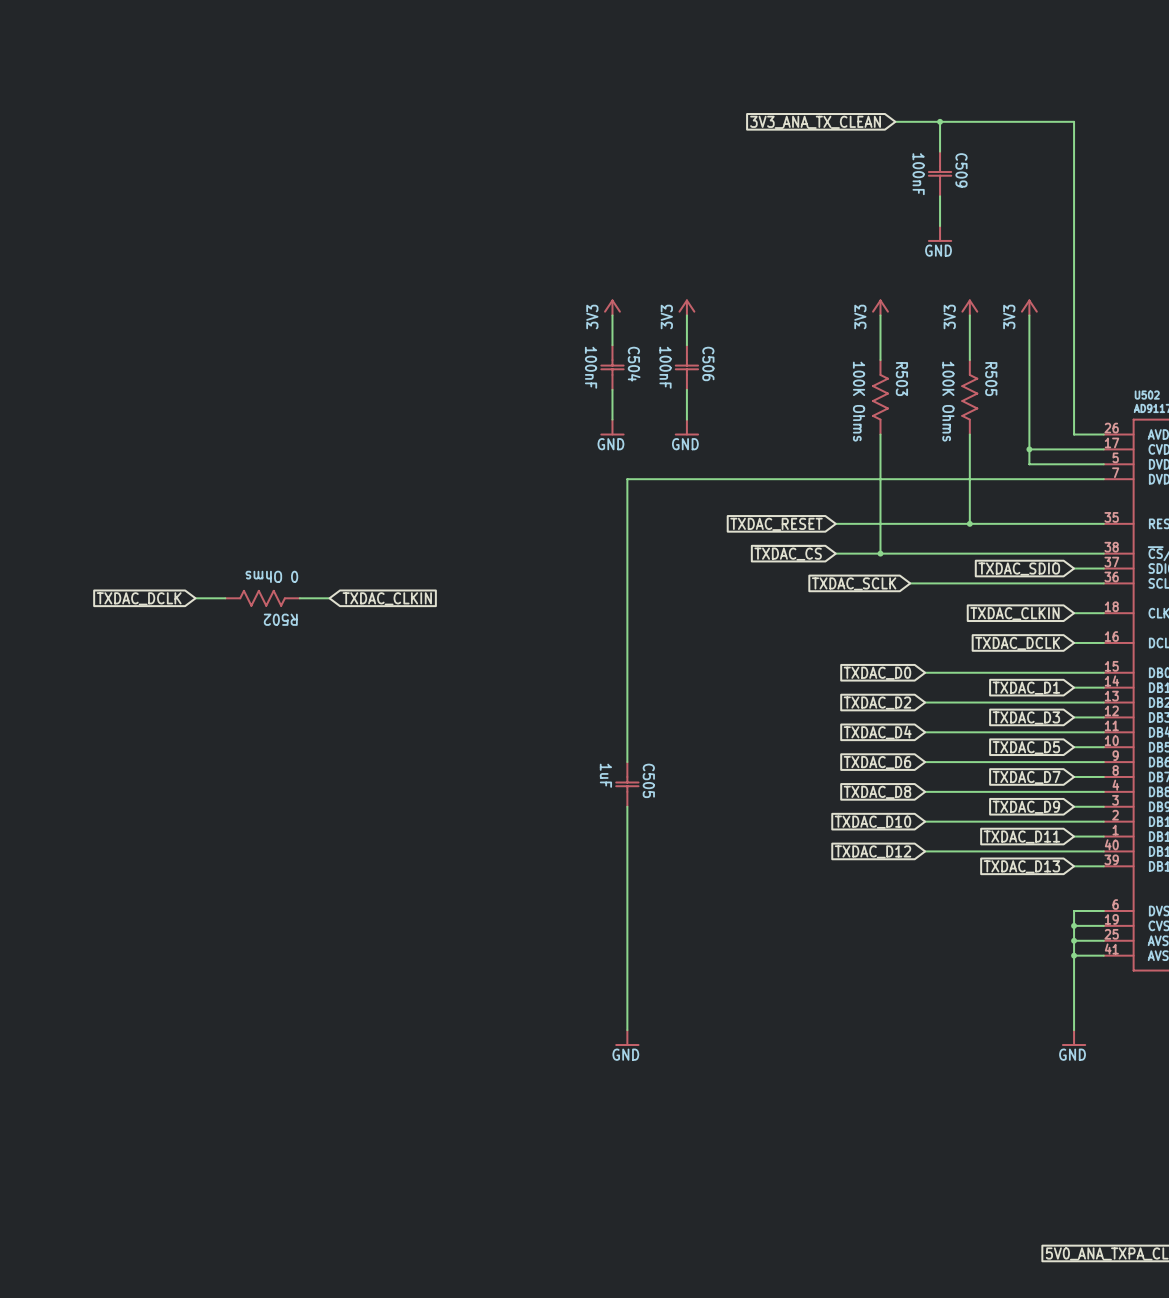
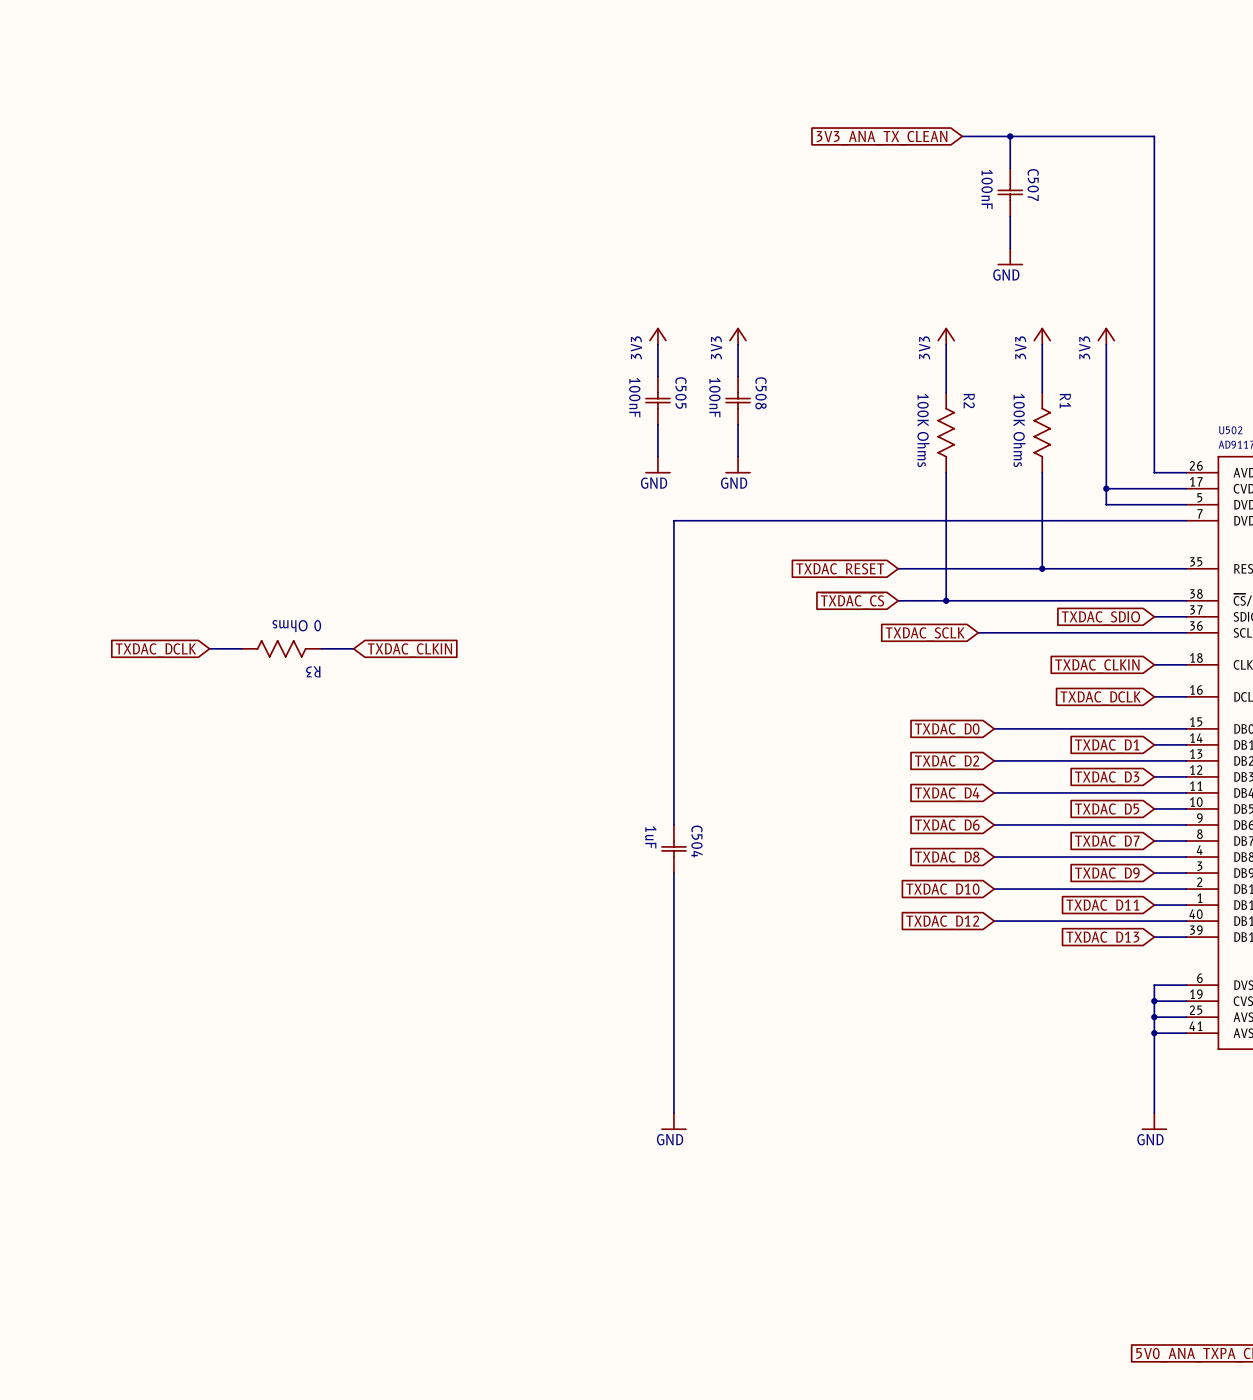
C509 name: C509 (961, 170) -> C507 (1033, 185)
C506 name: C506 (708, 363) -> C508 (761, 393)
C504 name: C504 (634, 364) -> C505 (680, 393)
R503 name: R503 (901, 379) -> R2 (969, 400)
R505 name: R505 (991, 379) -> R1 (1065, 400)
R502 name: R502 (280, 619) -> R3 (313, 671)
C505 name: C505 (648, 780) -> C504 (696, 841)

